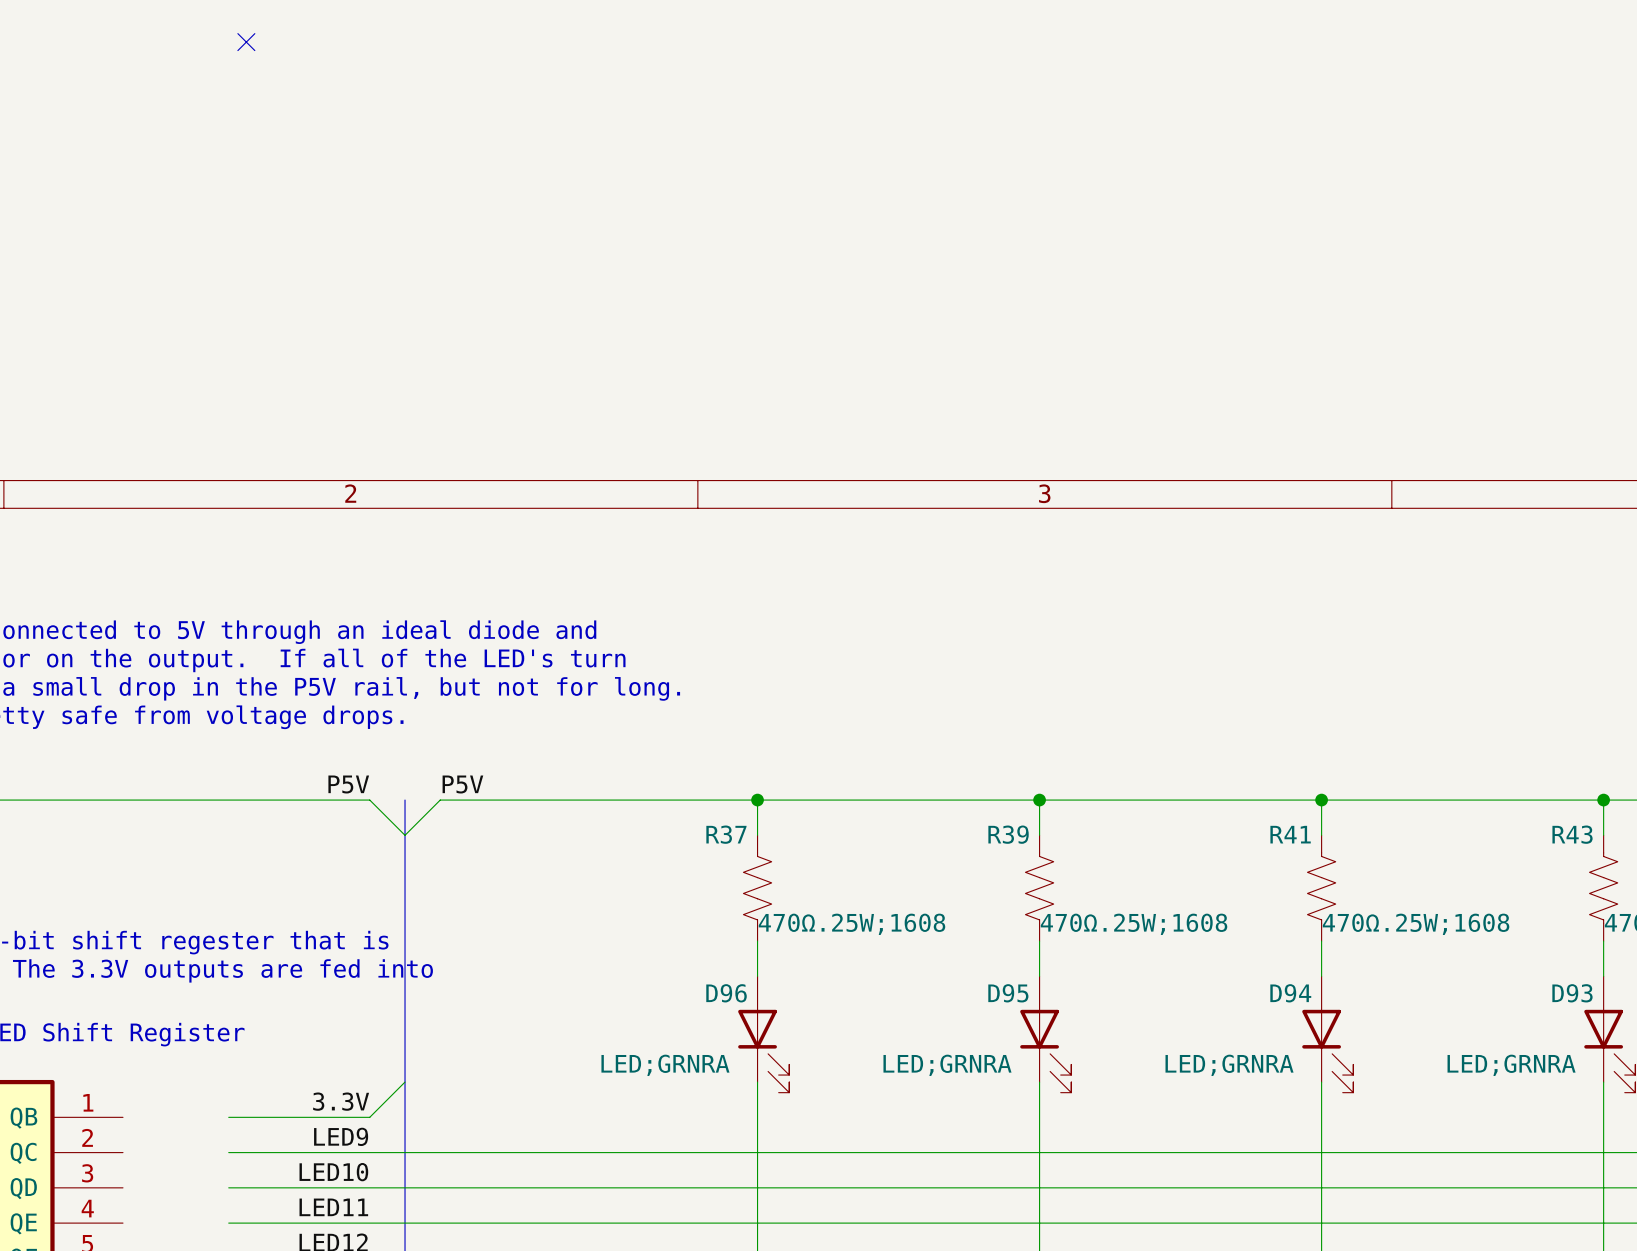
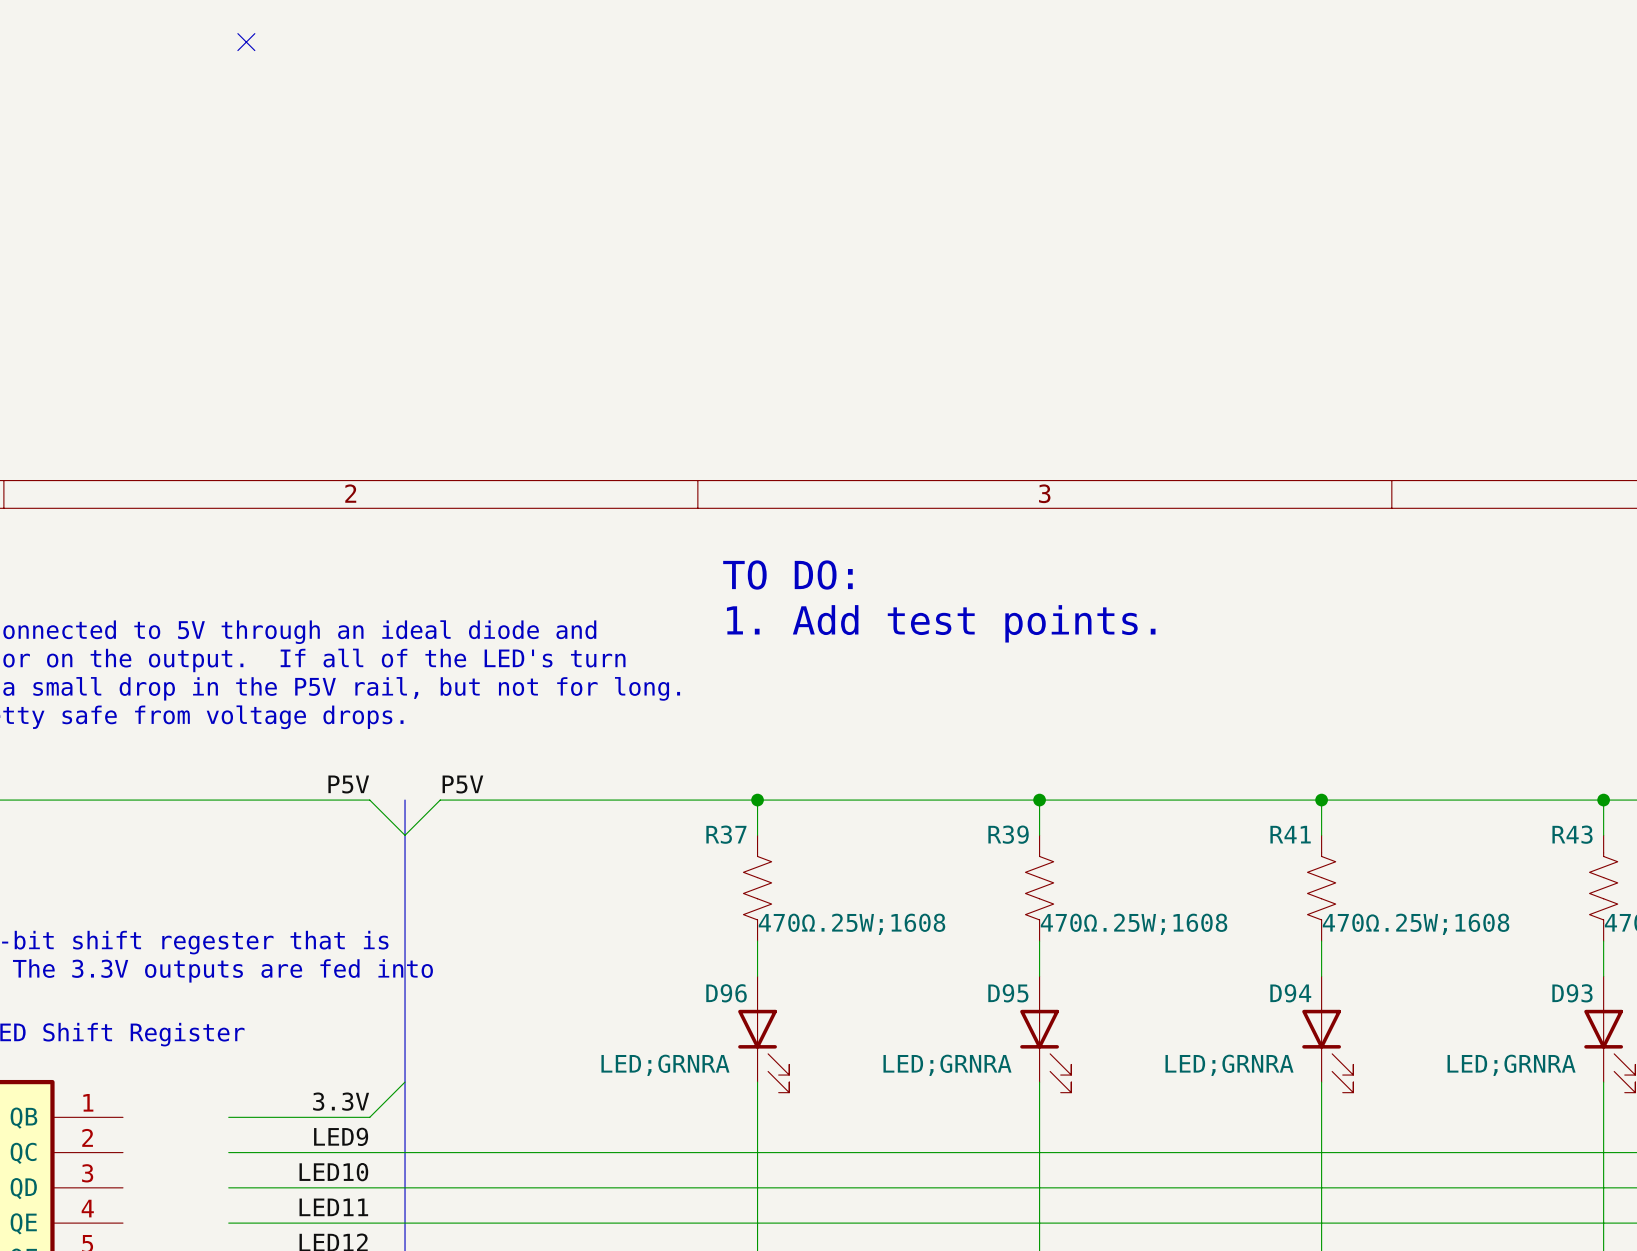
text: none -> TO DO: (787, 575)
text: none -> 1. Add test points. (941, 623)

